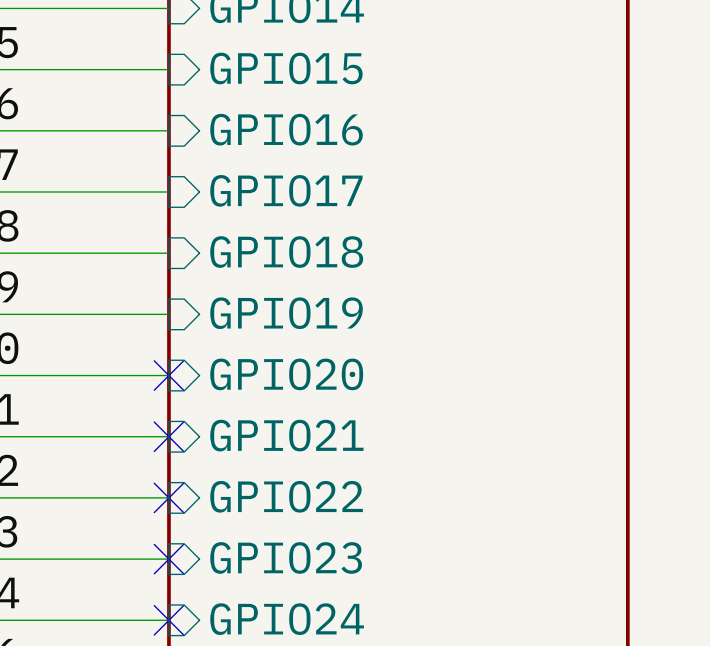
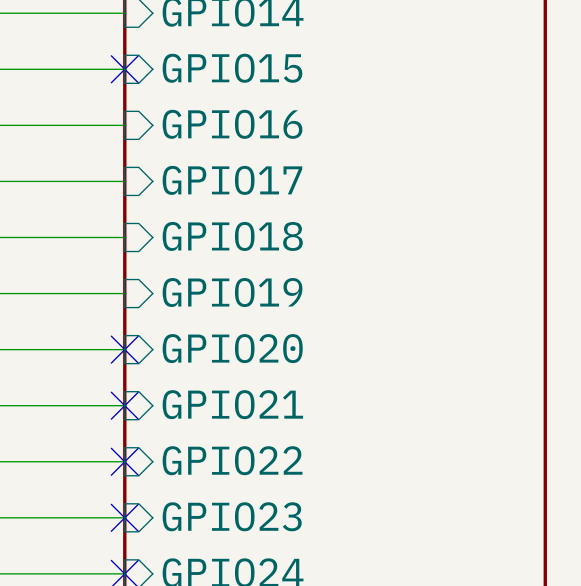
no-connect mark: none -> (124, 69)

